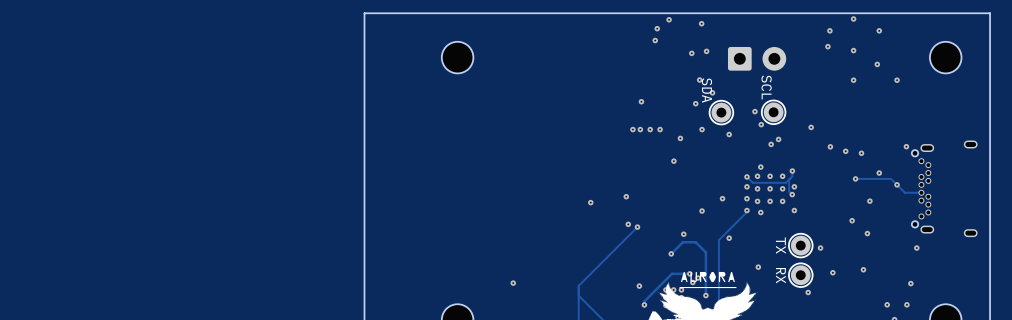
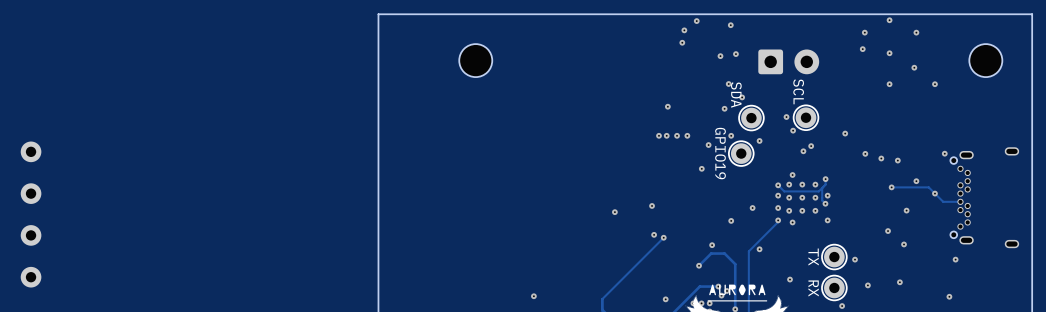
part: none -> (31, 151)
part: none -> GPIO19 (741, 153)
part: none -> (31, 193)
part: none -> (31, 235)
part: none -> (31, 277)

